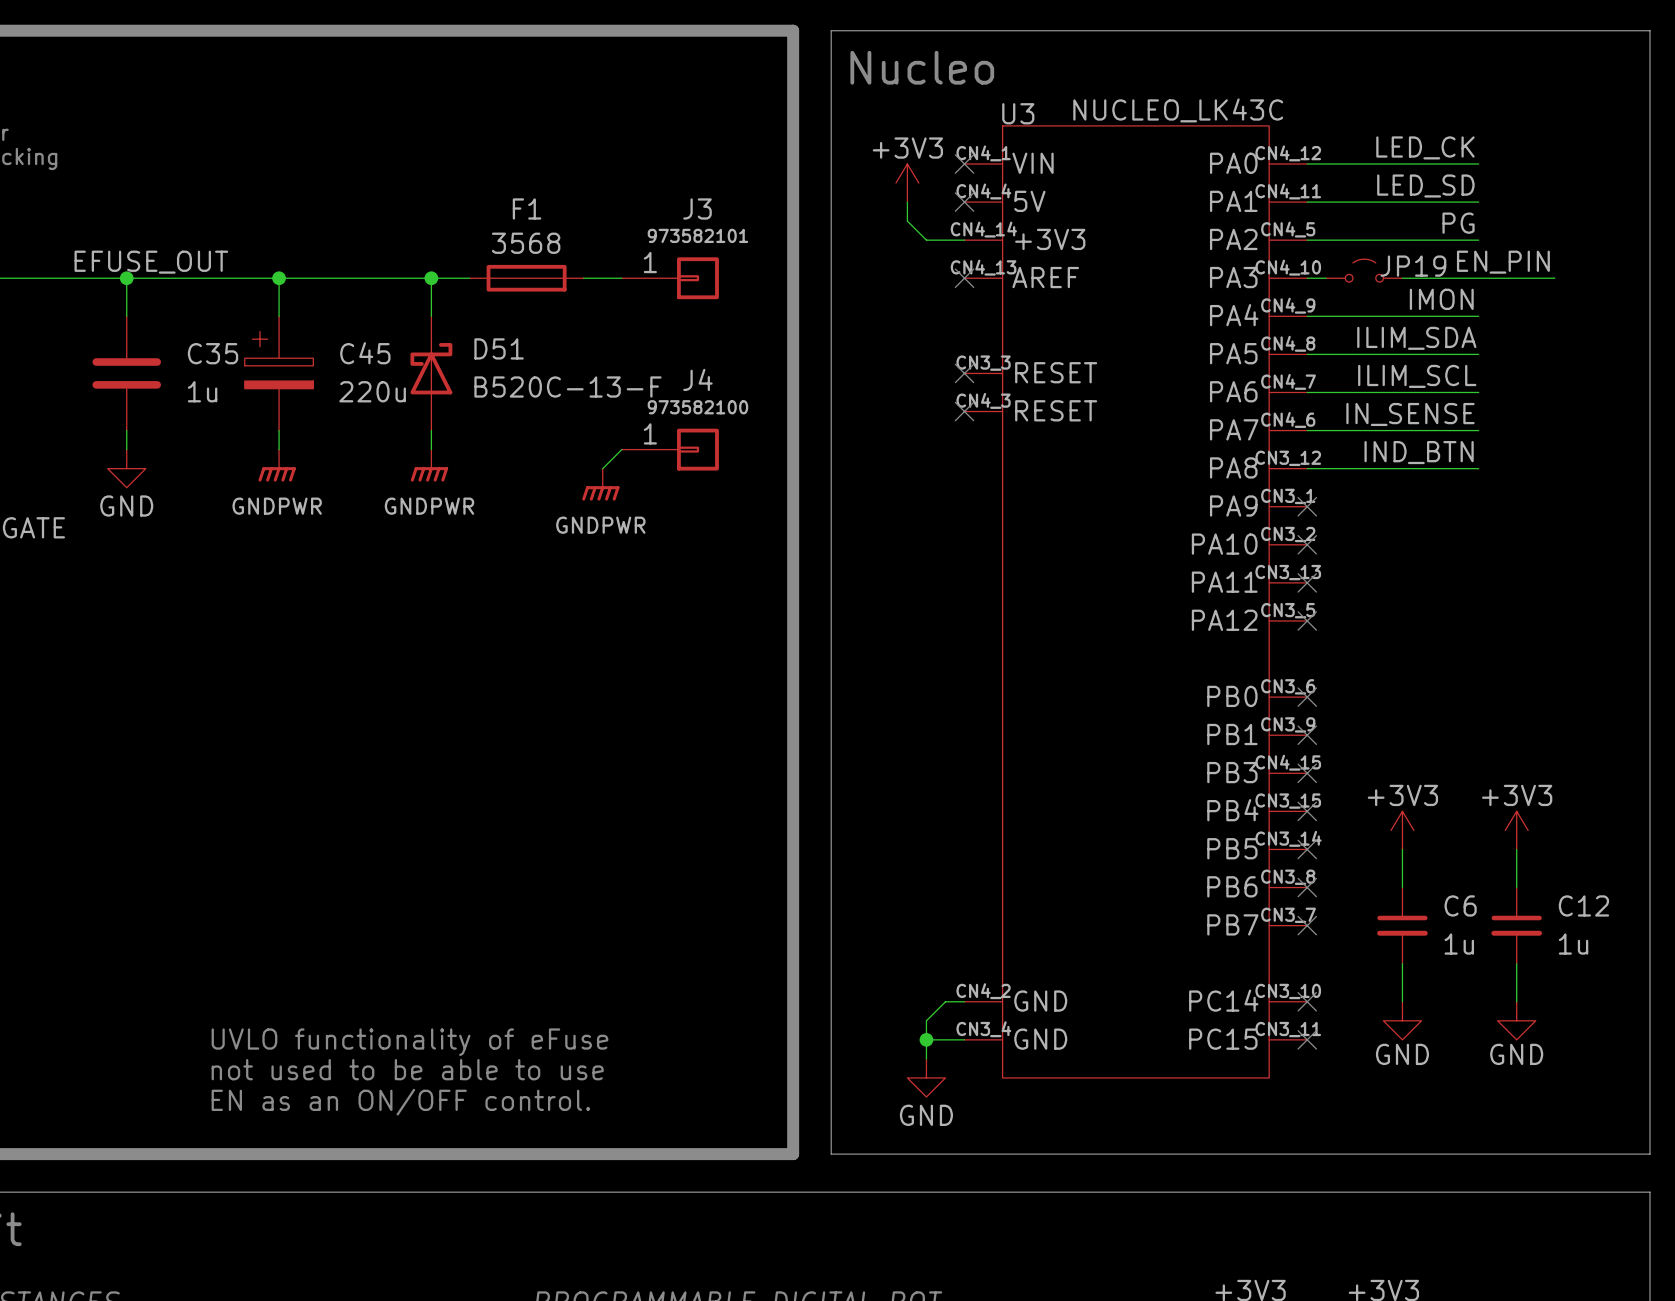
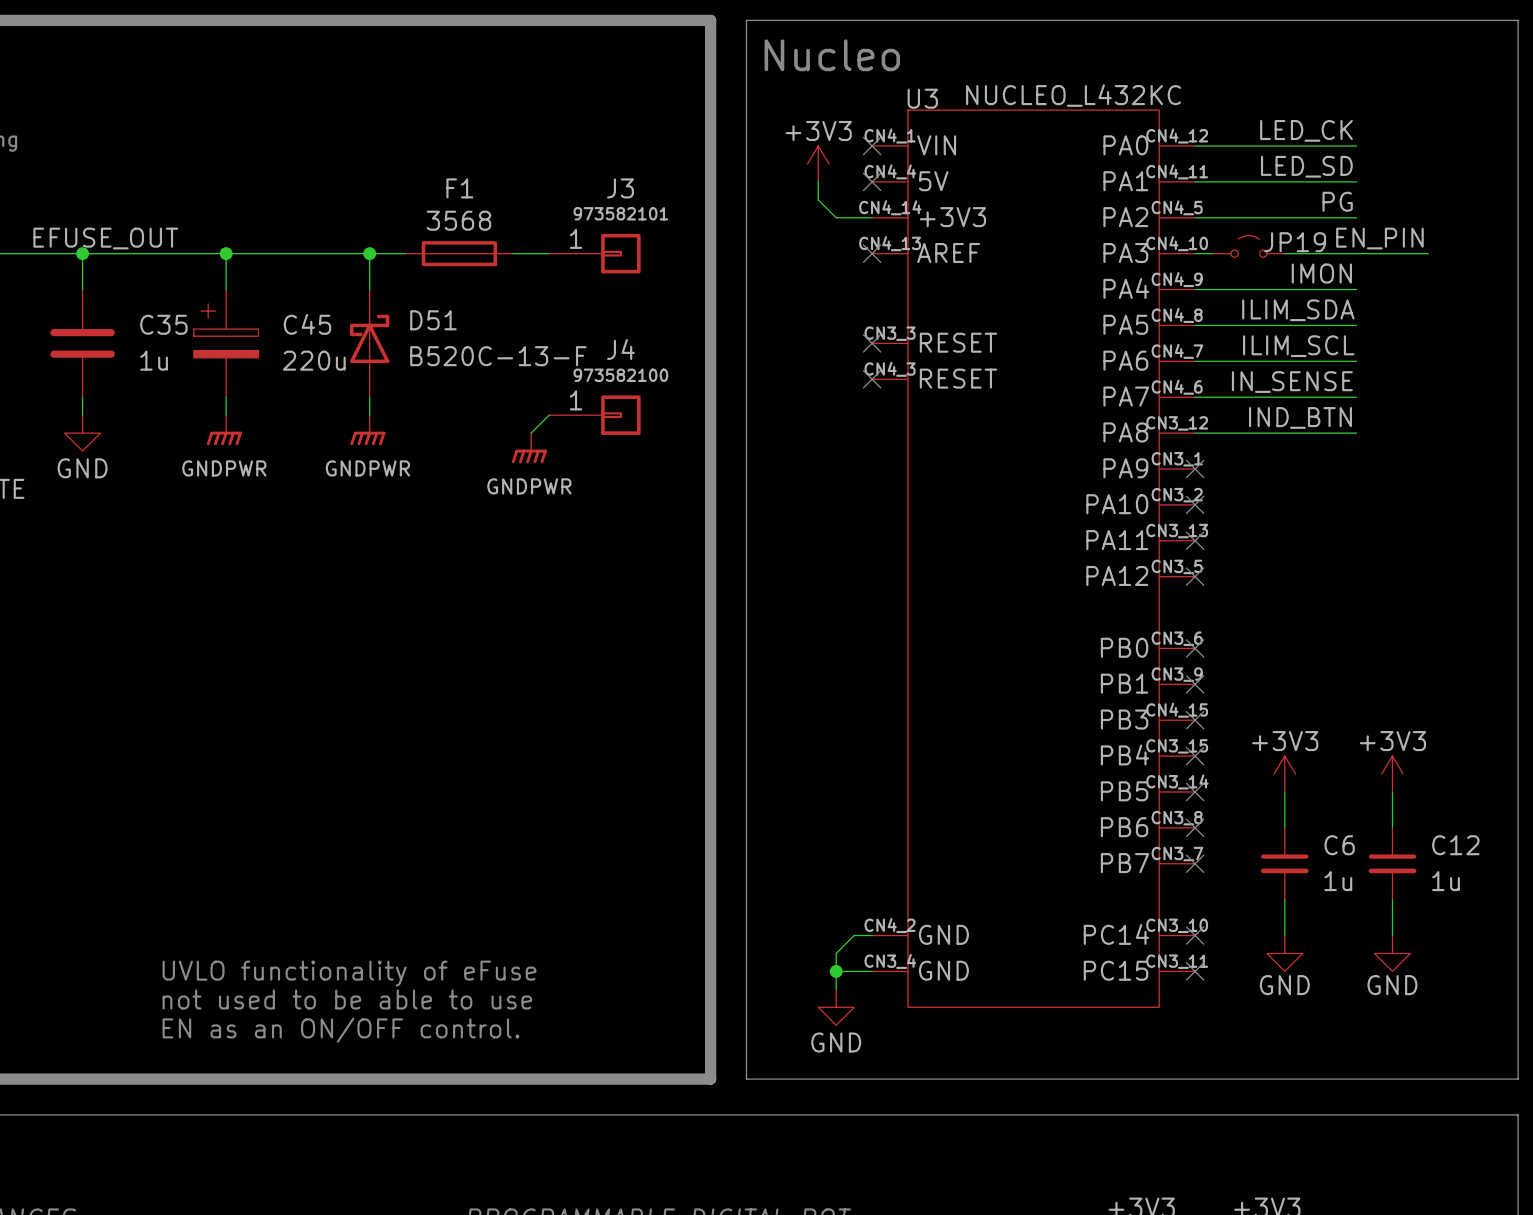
U3 value: NUCLEO_LK43C (1178, 110) -> NUCLEO_L432KC (1073, 95)

